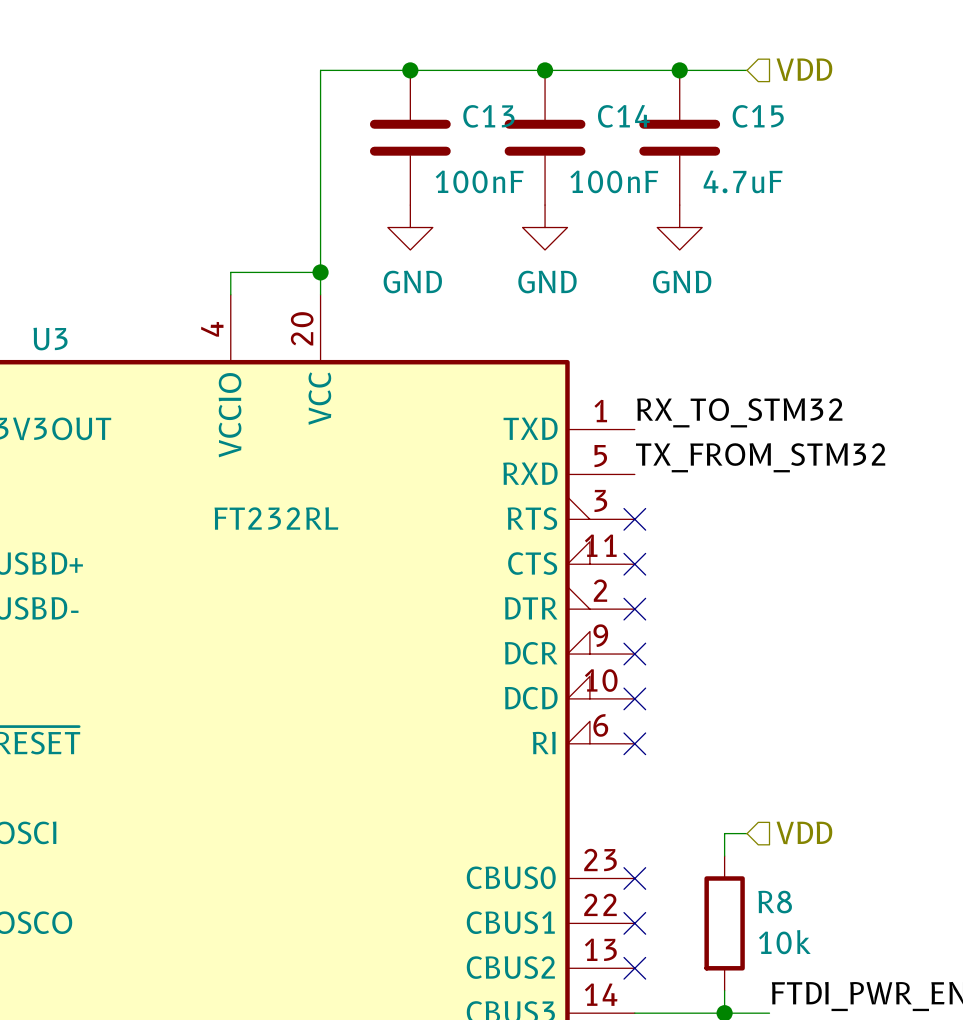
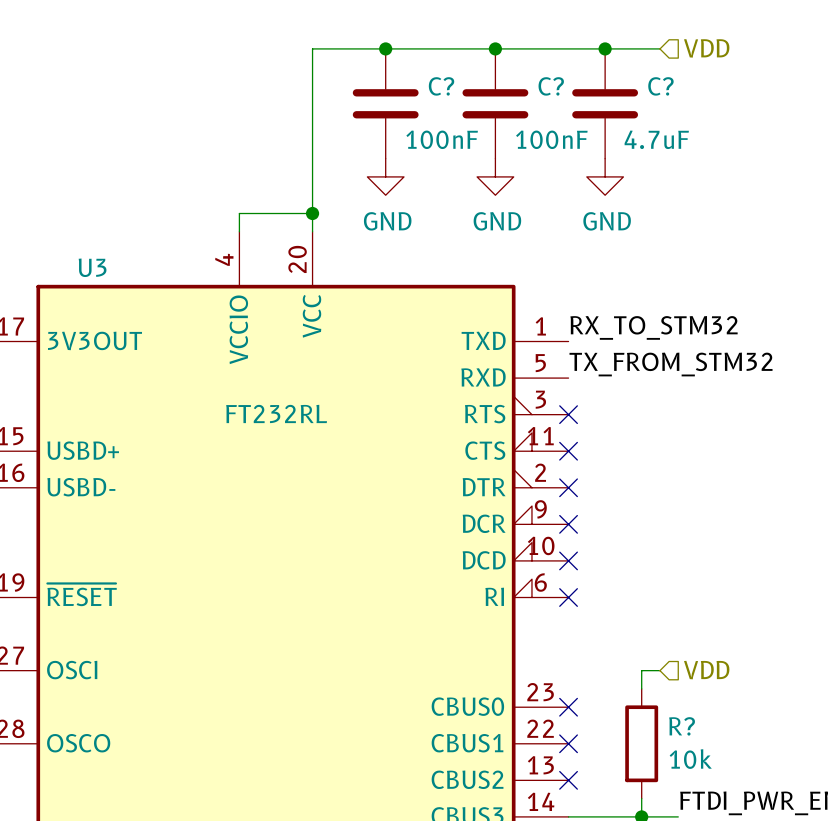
C13 name: C13 (488, 116) -> C? (441, 86)
C14 name: C14 (623, 116) -> C? (551, 86)
C15 name: C15 (758, 116) -> C? (660, 86)
R8 name: R8 (775, 902) -> R? (682, 726)

